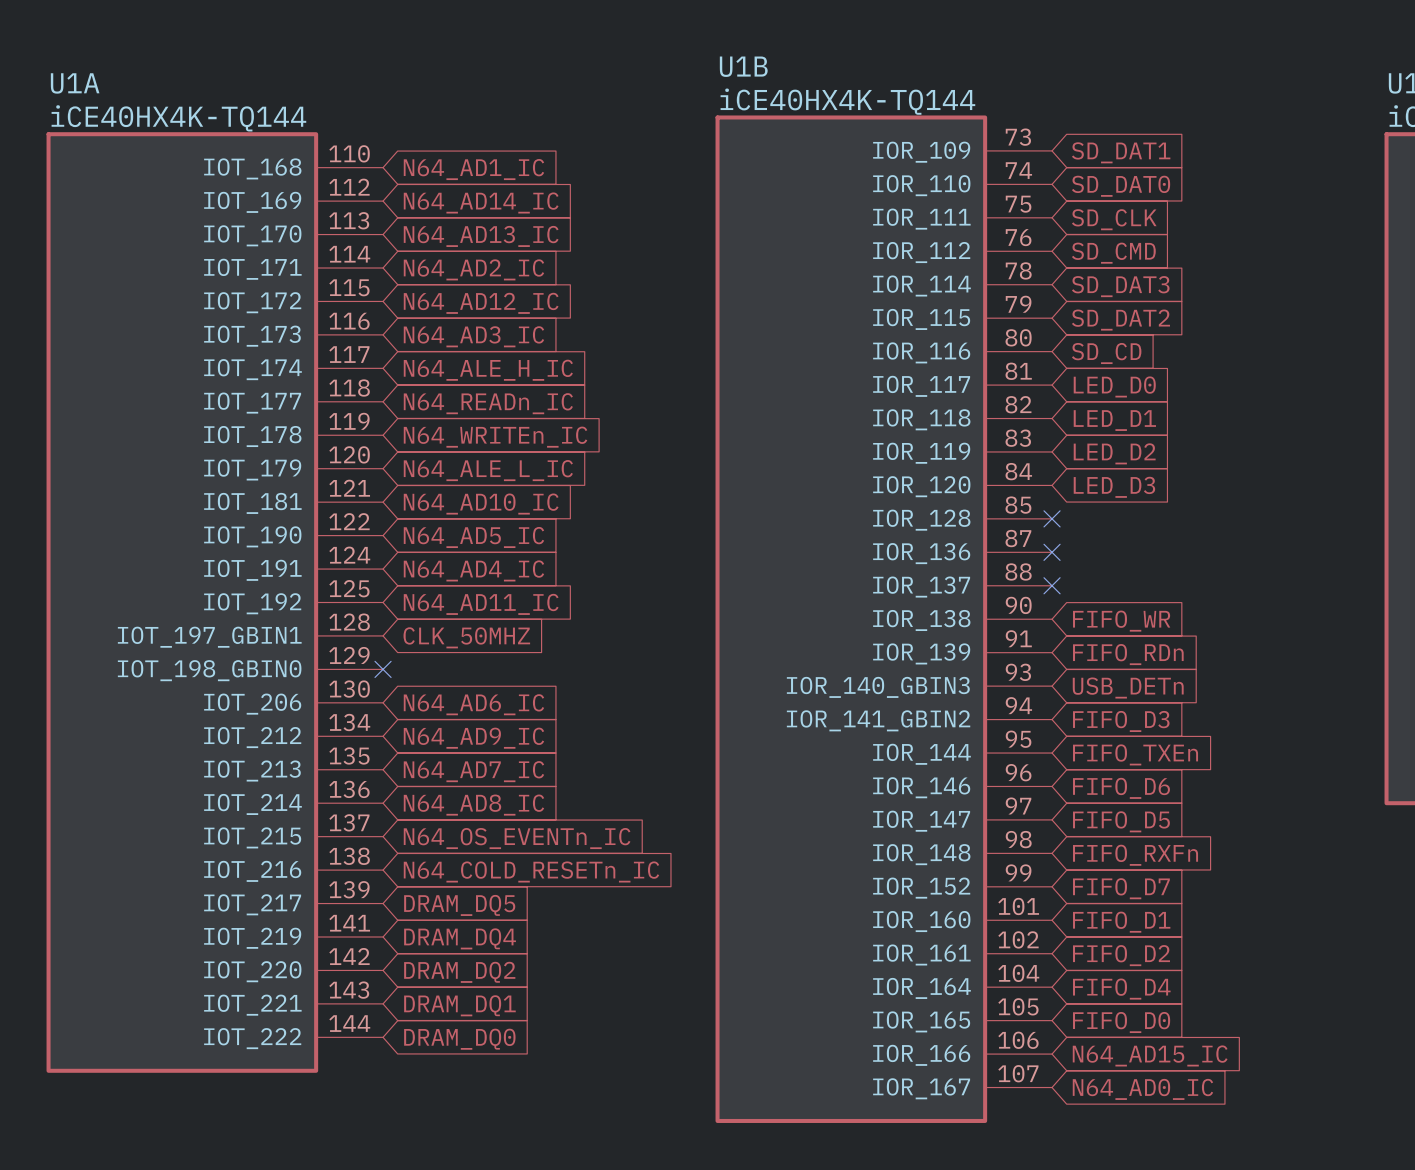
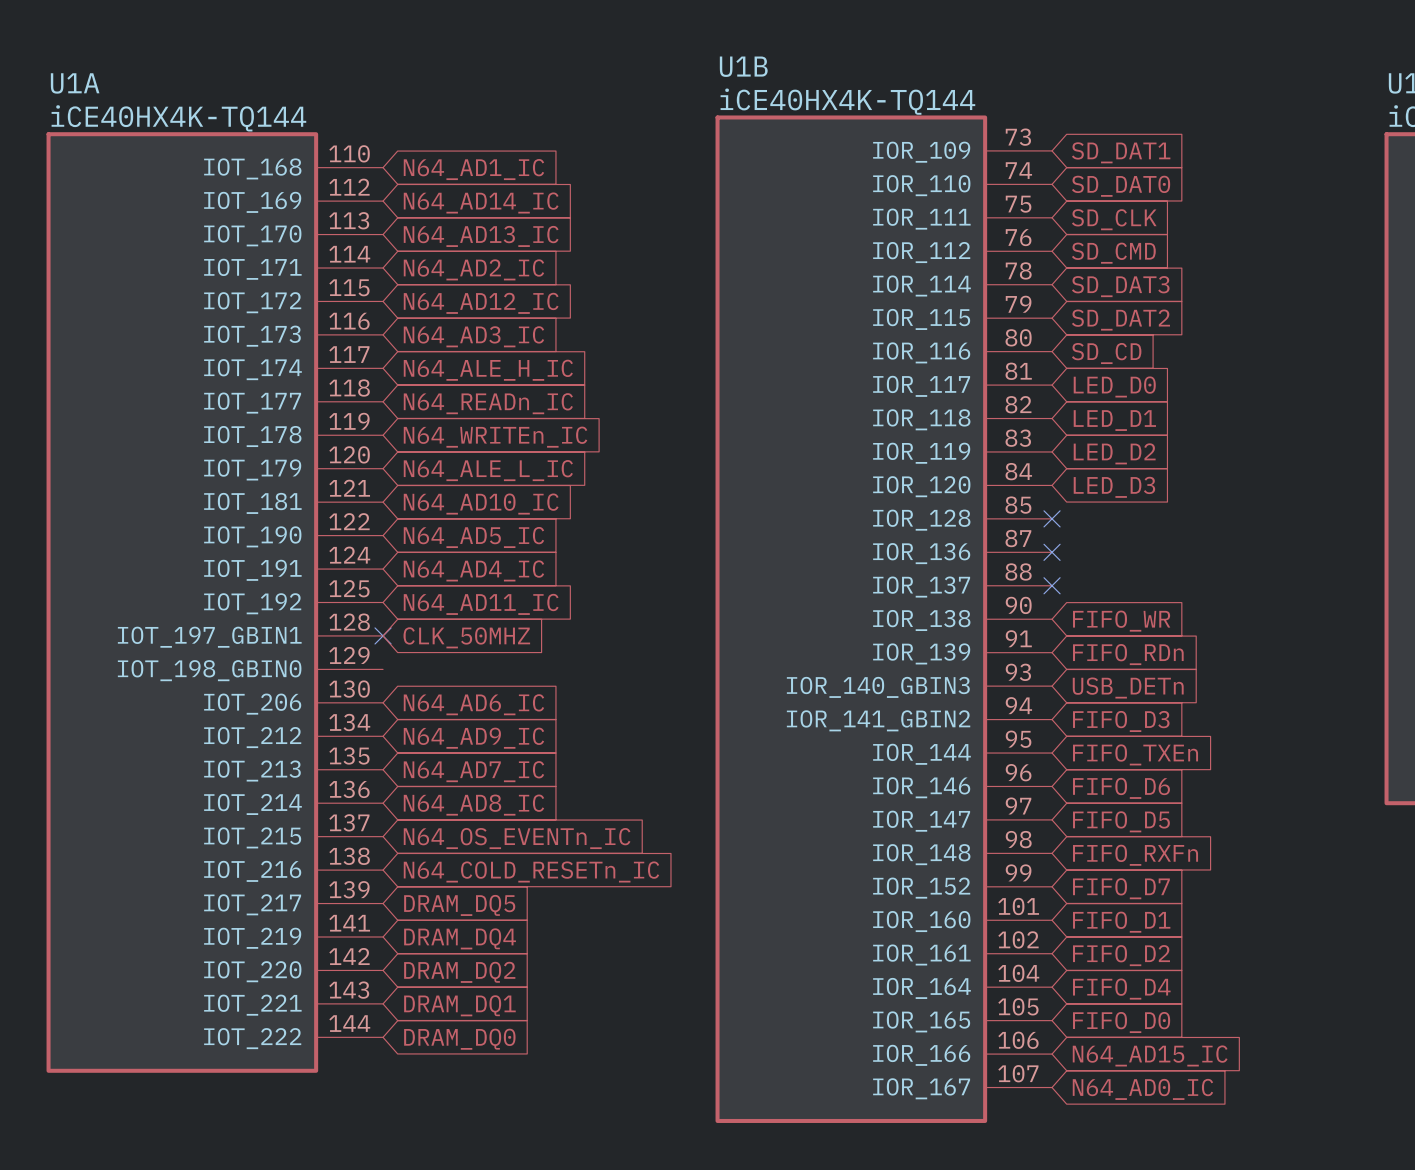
no-connect mark position: (383, 669) -> (383, 635)

